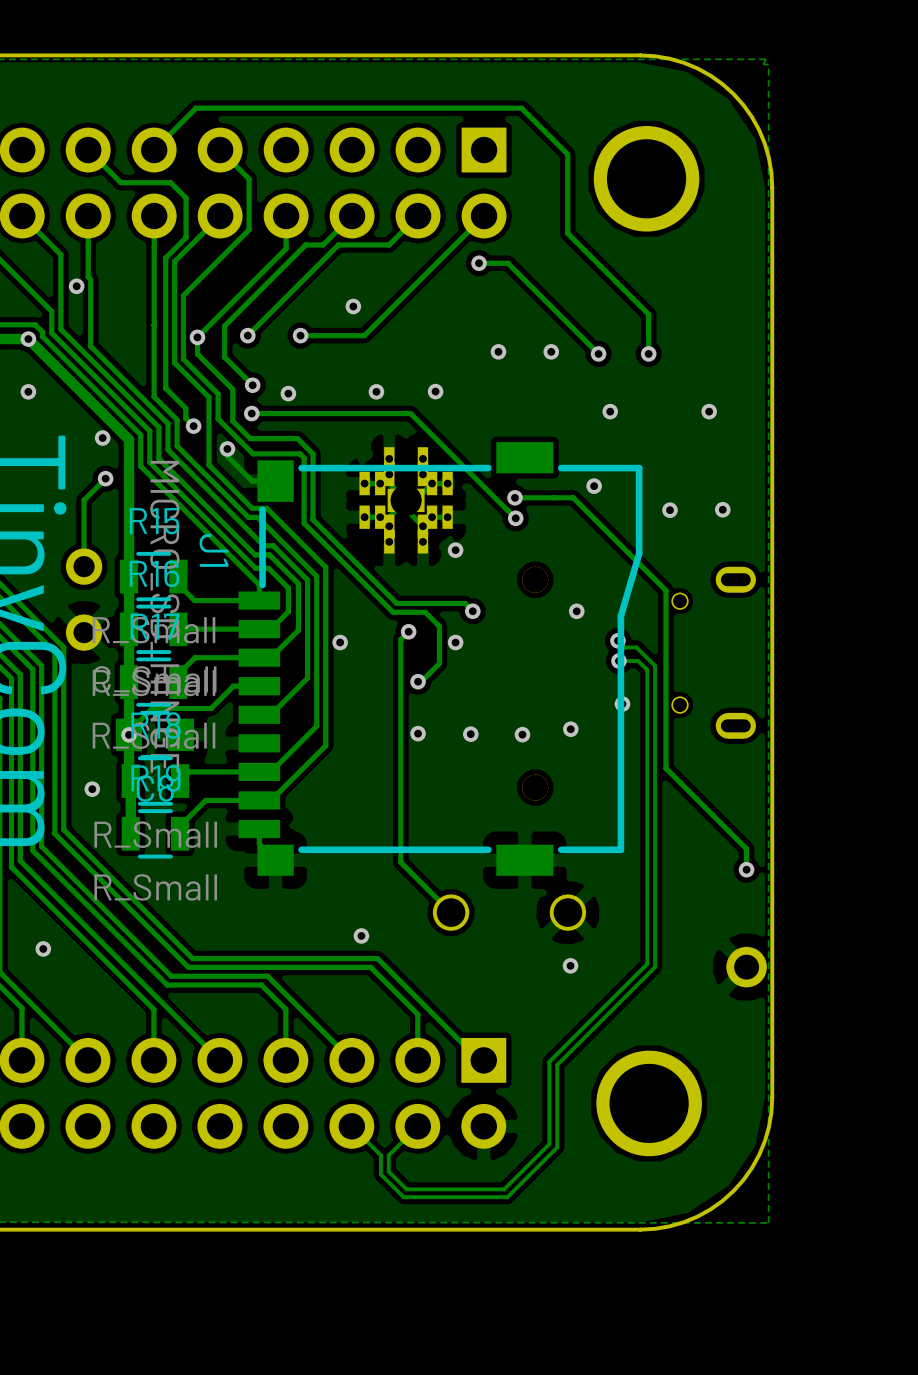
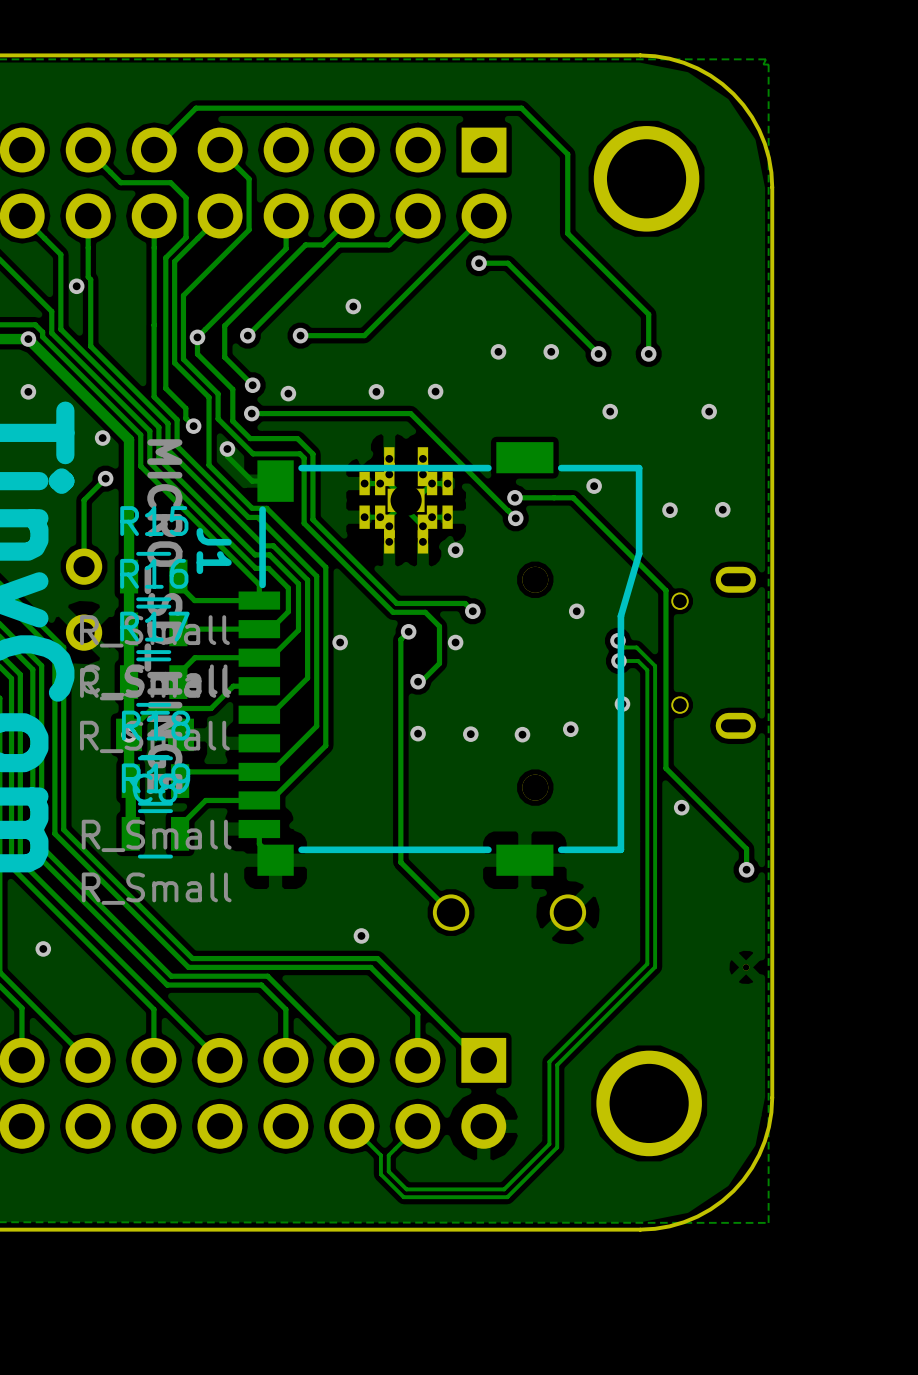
via: (92, 789) -> none
via: none -> (681, 807)
part footprint: [726, 946, 767, 988] -> [742, 964, 750, 971]
via: (570, 965) -> none

